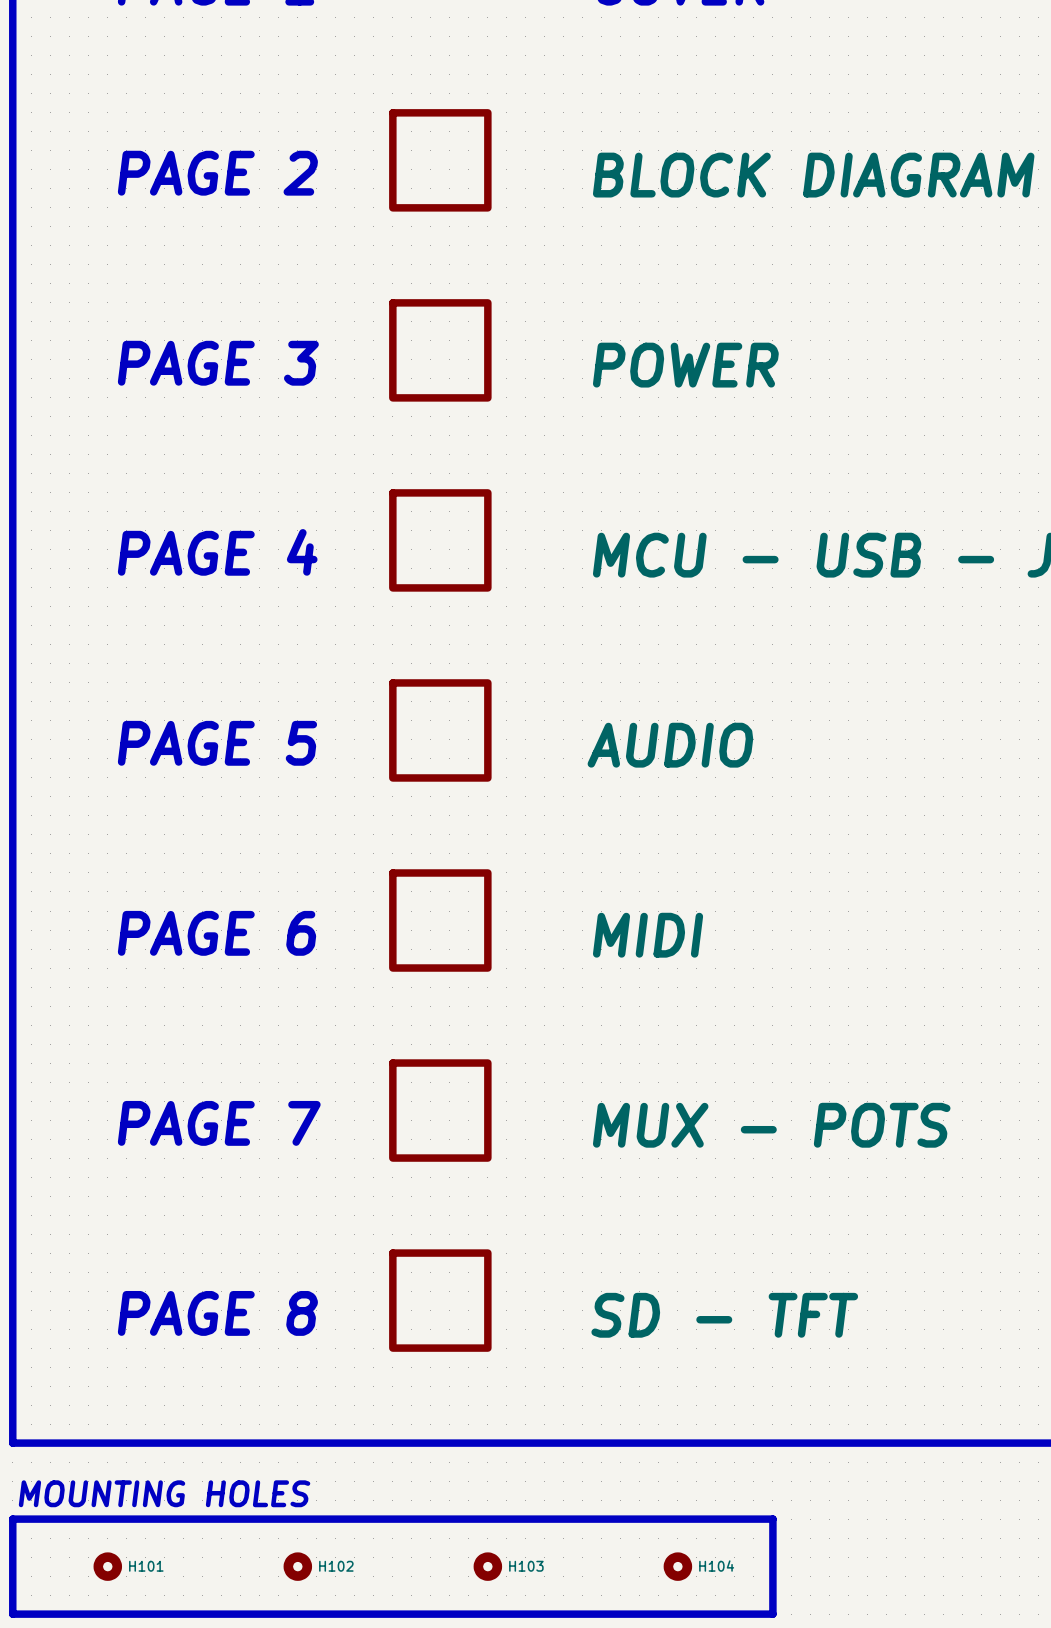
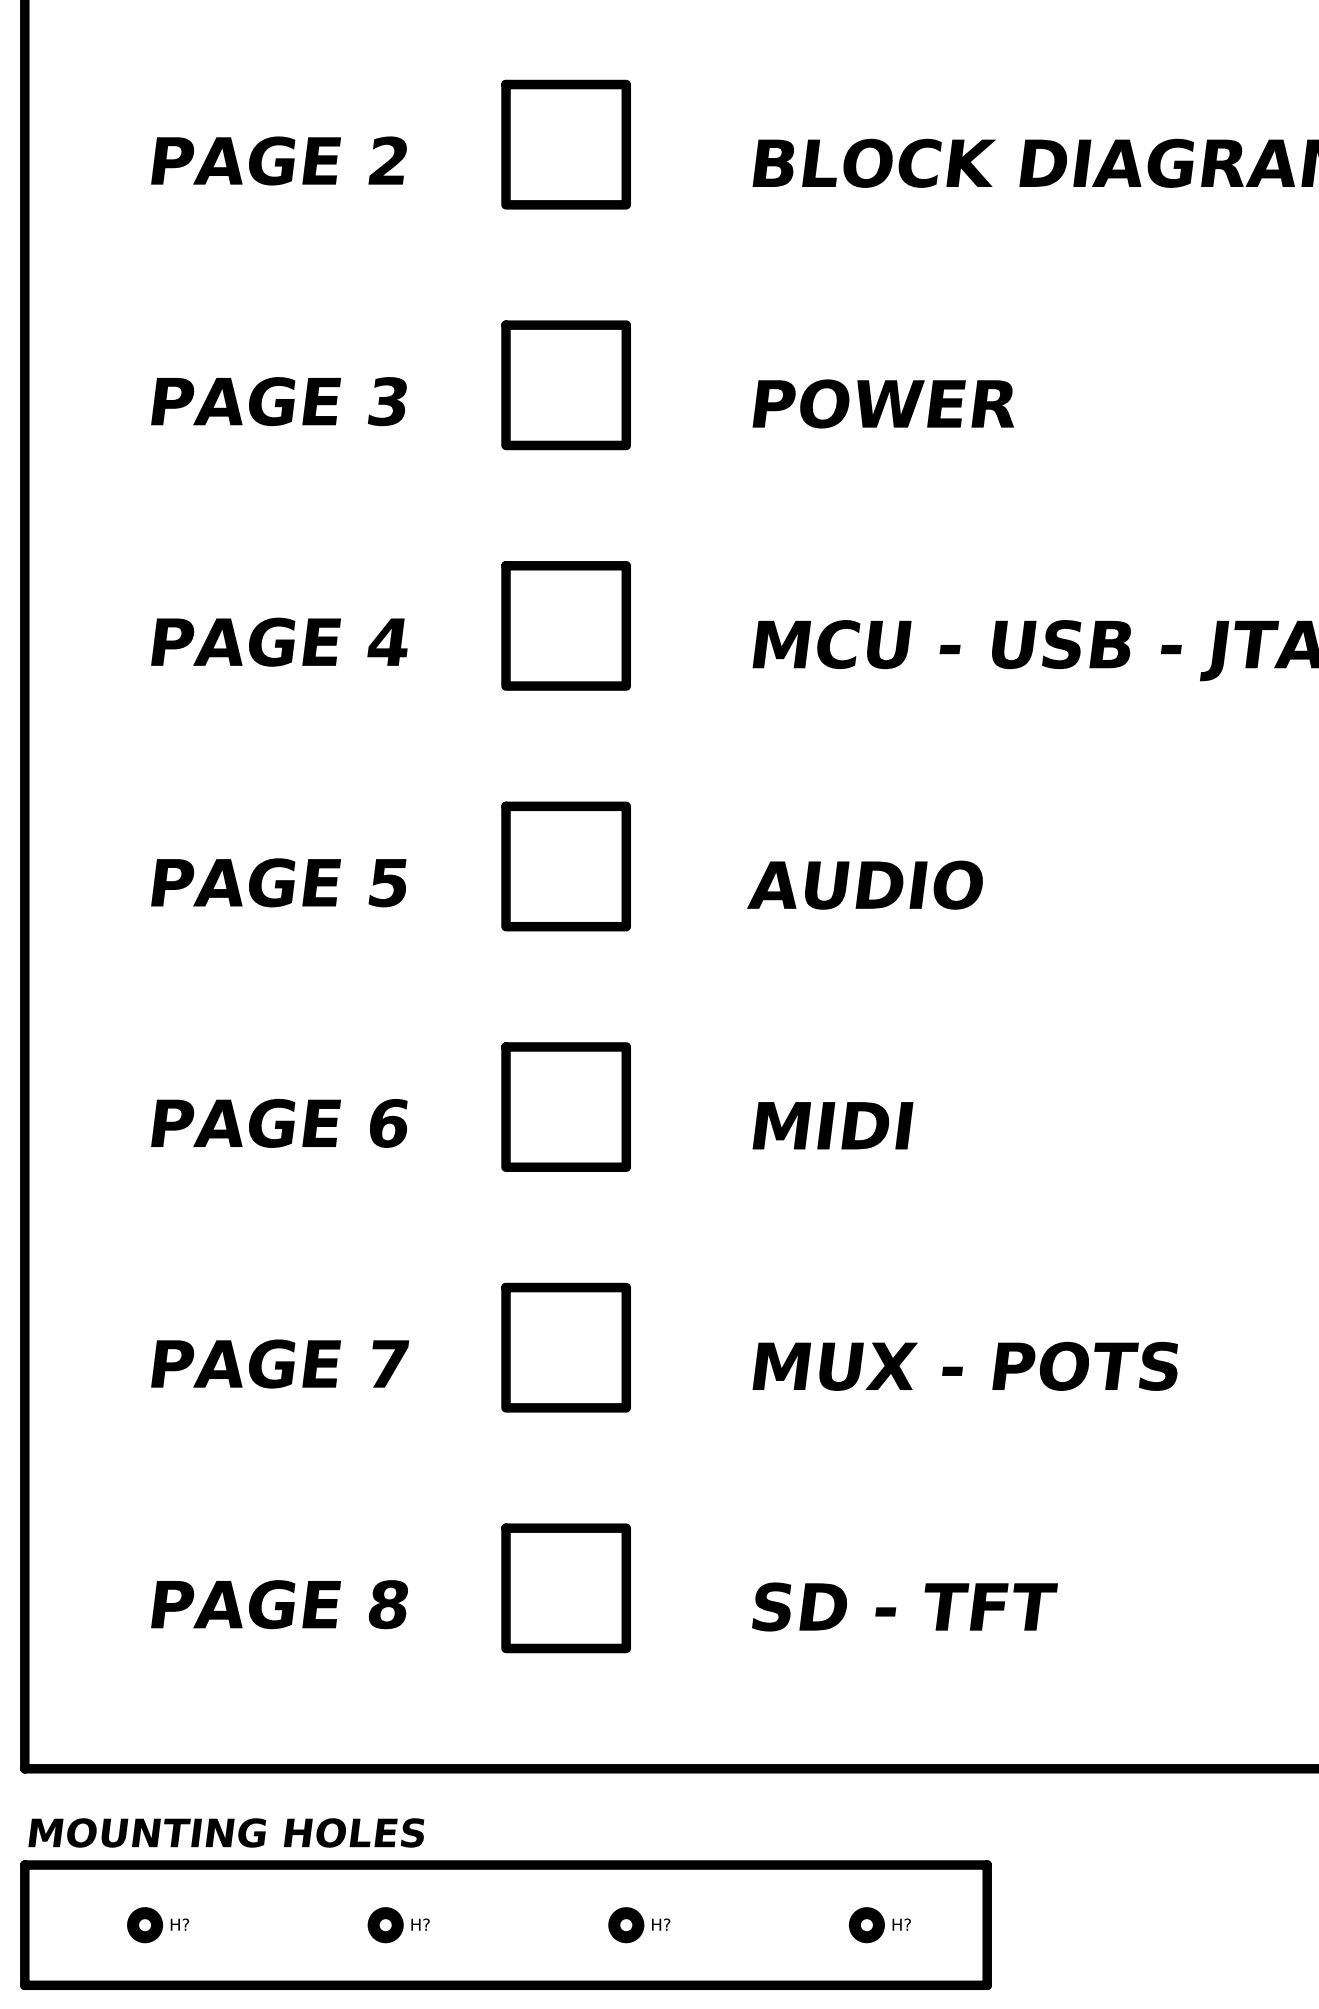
H101 name: H101 (146, 1566) -> H? (179, 1924)
H102 name: H102 (336, 1566) -> H? (420, 1924)
H103 name: H103 (526, 1566) -> H? (661, 1924)
H104 name: H104 (716, 1566) -> H? (901, 1924)

